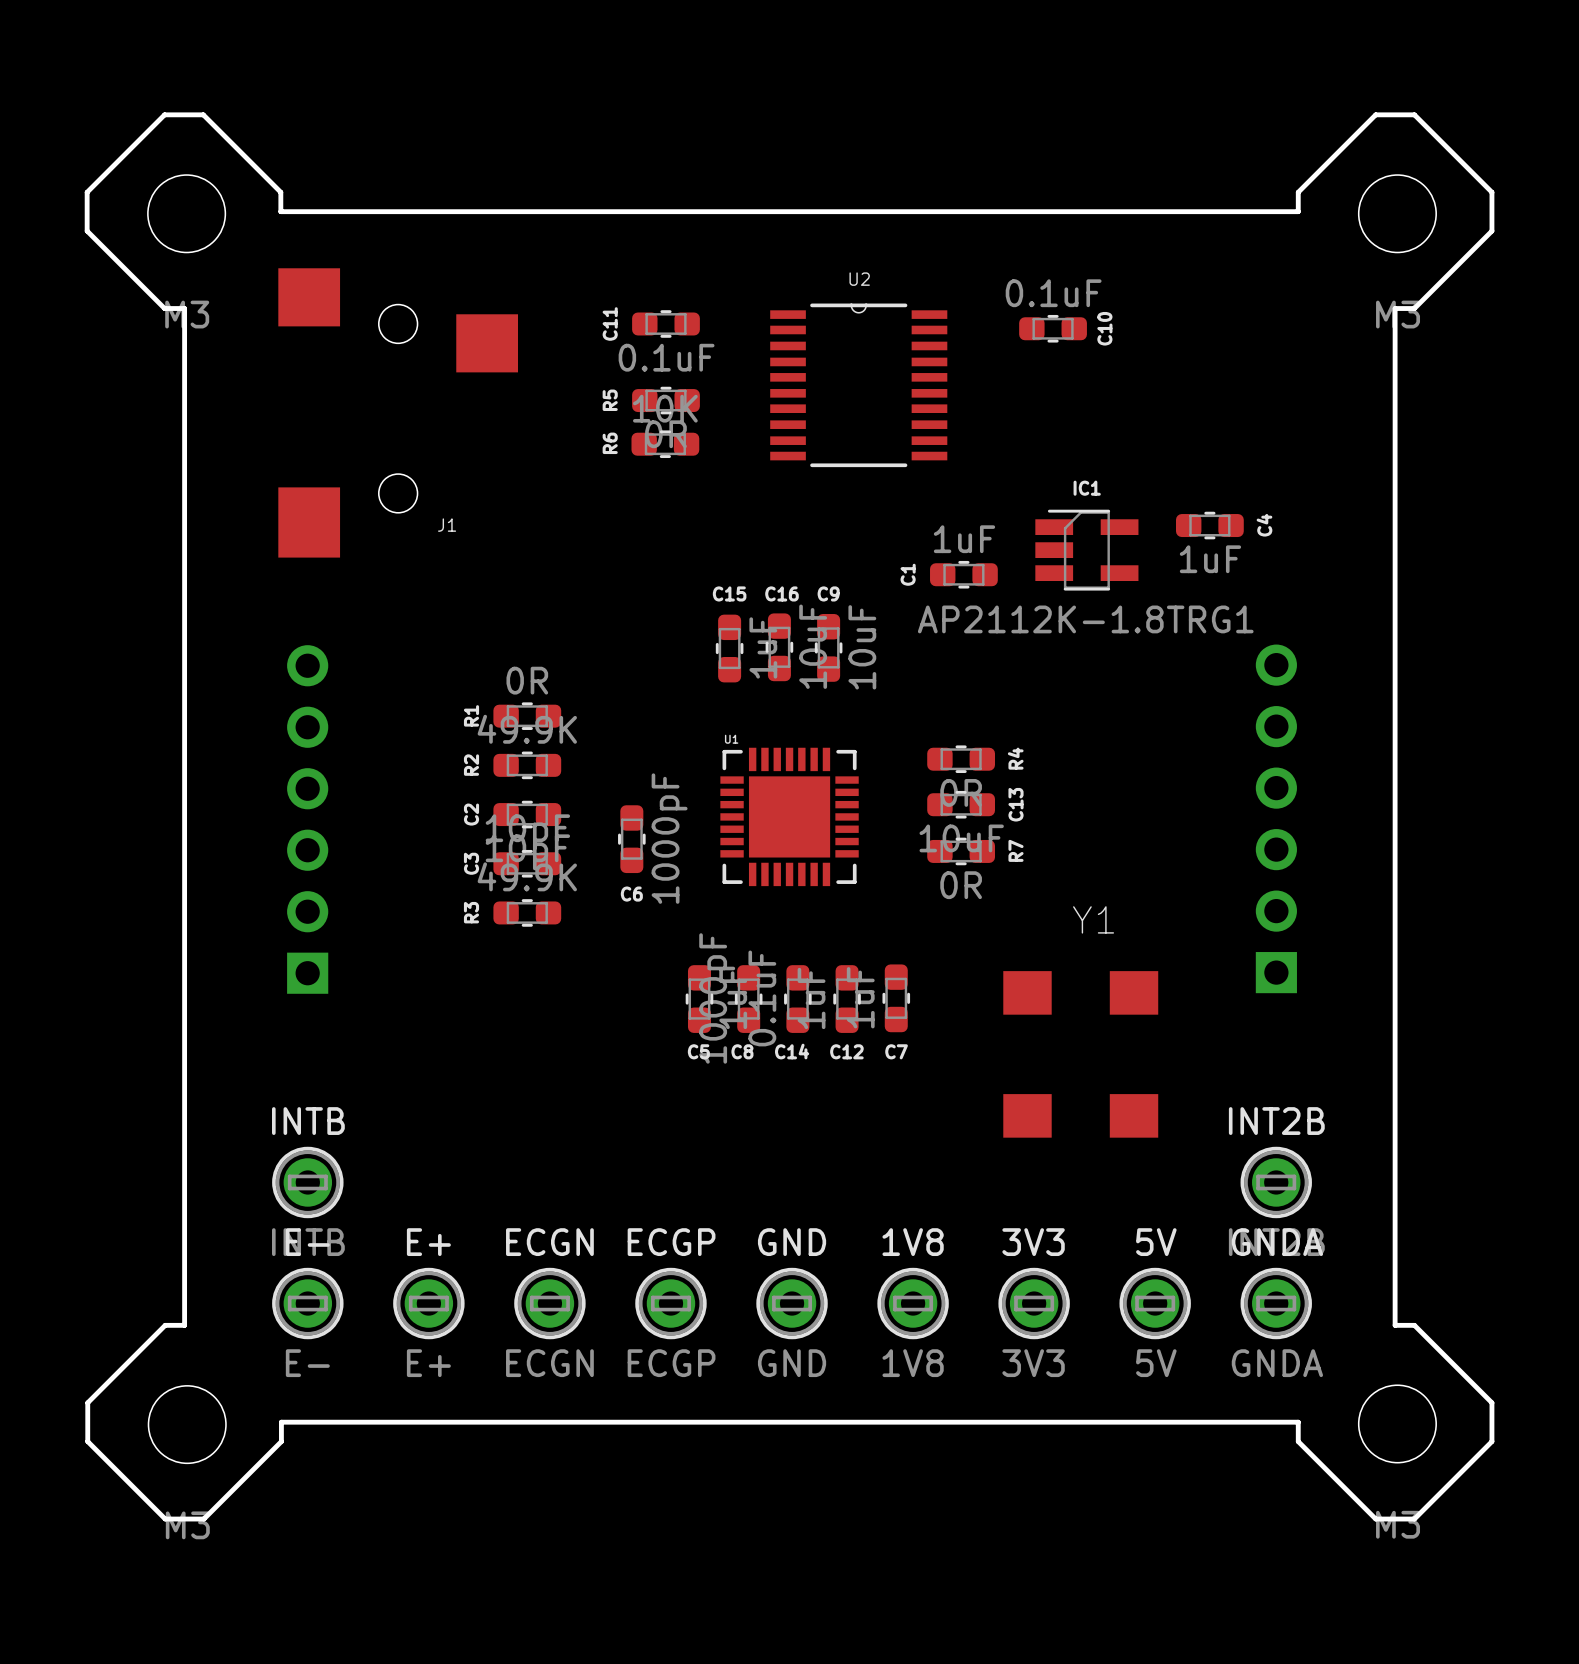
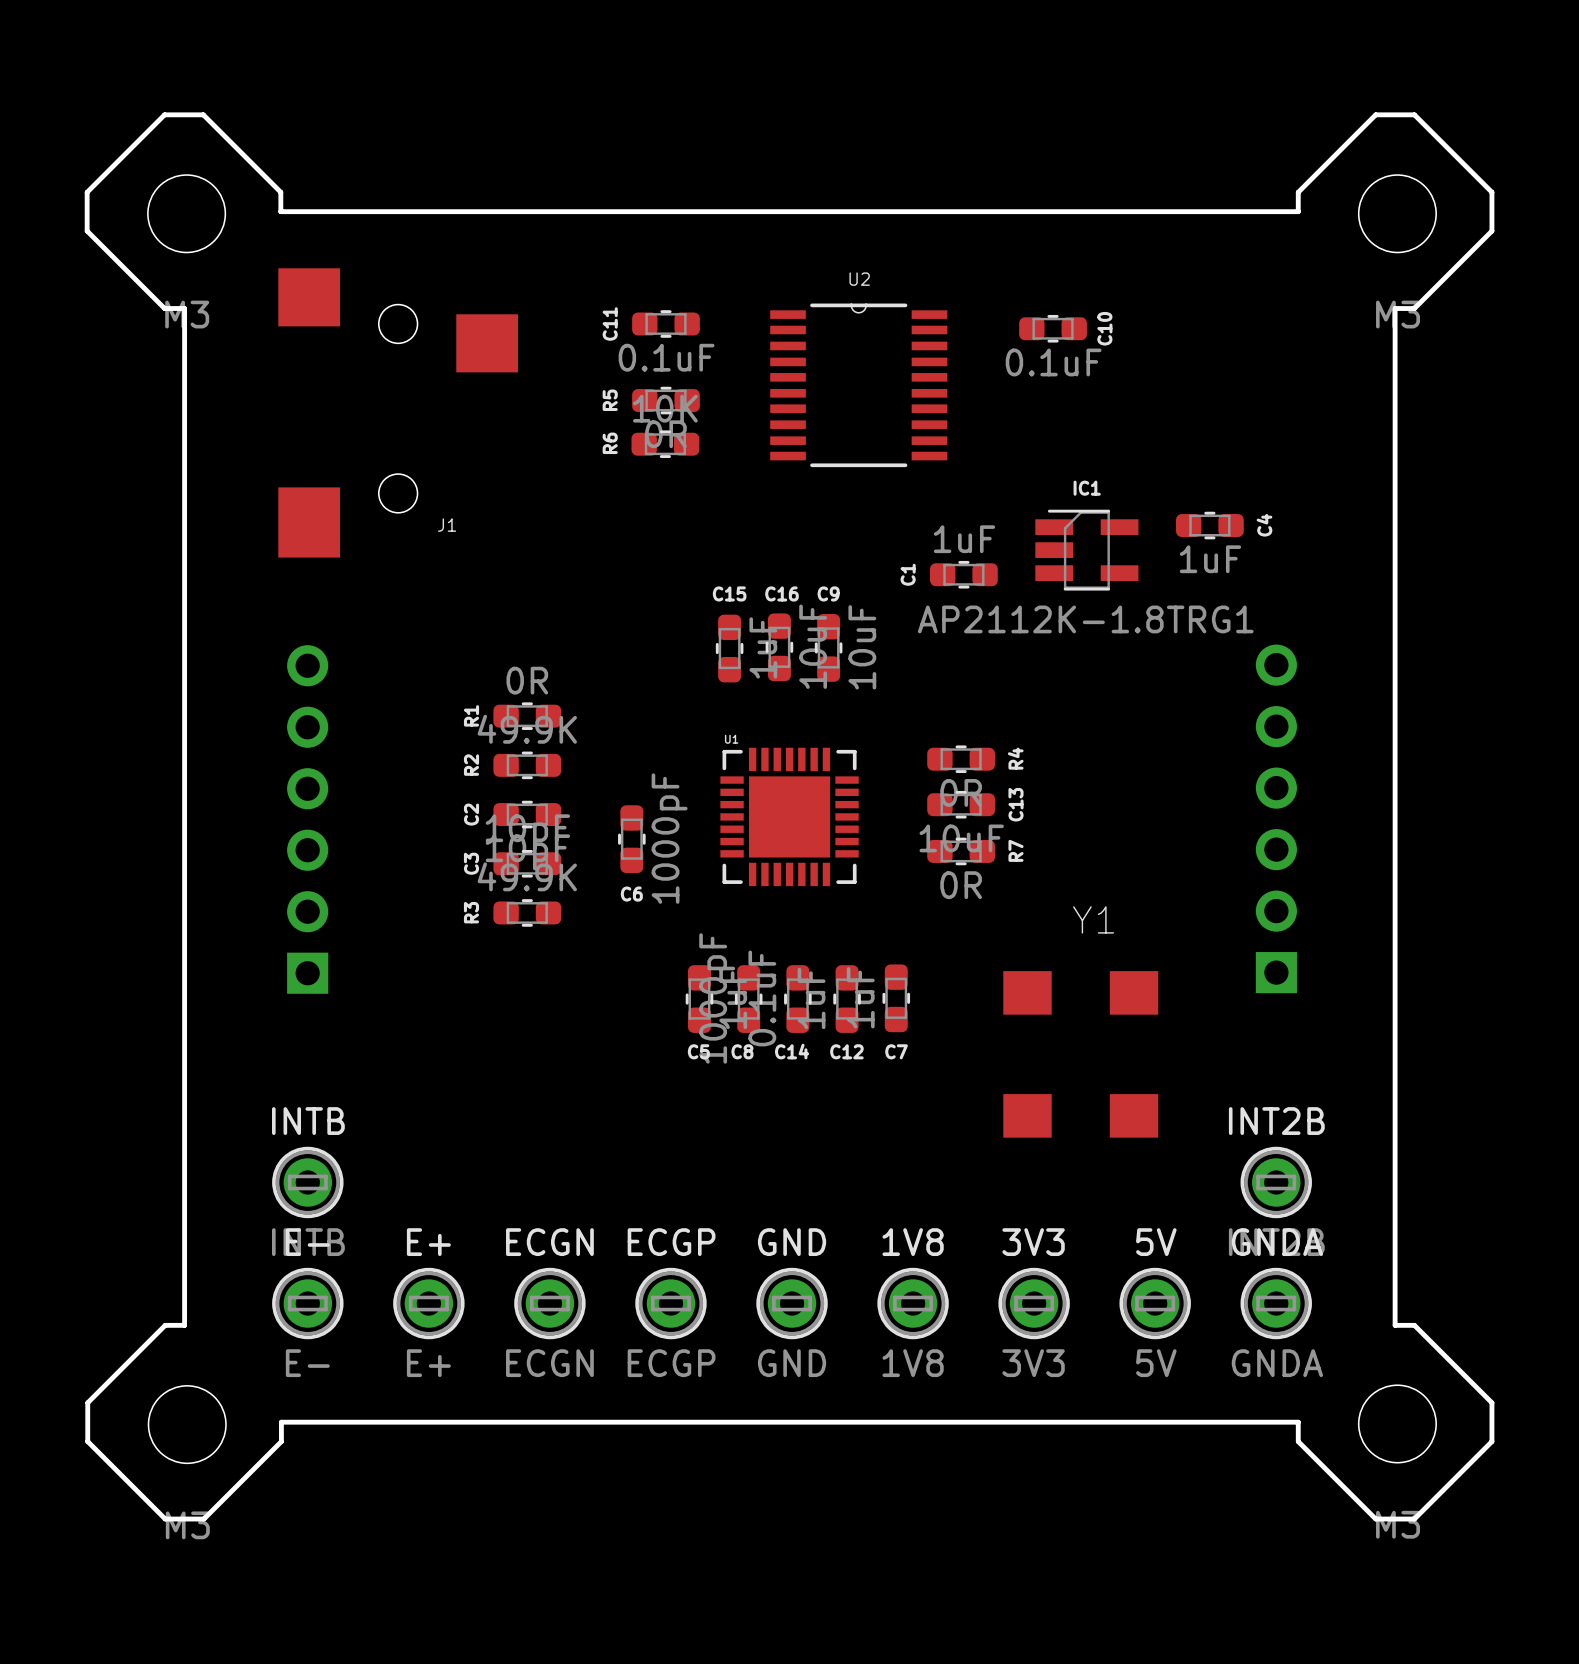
C10 value position: 0.1uF (1053, 293) -> 0.1uF (1053, 362)

